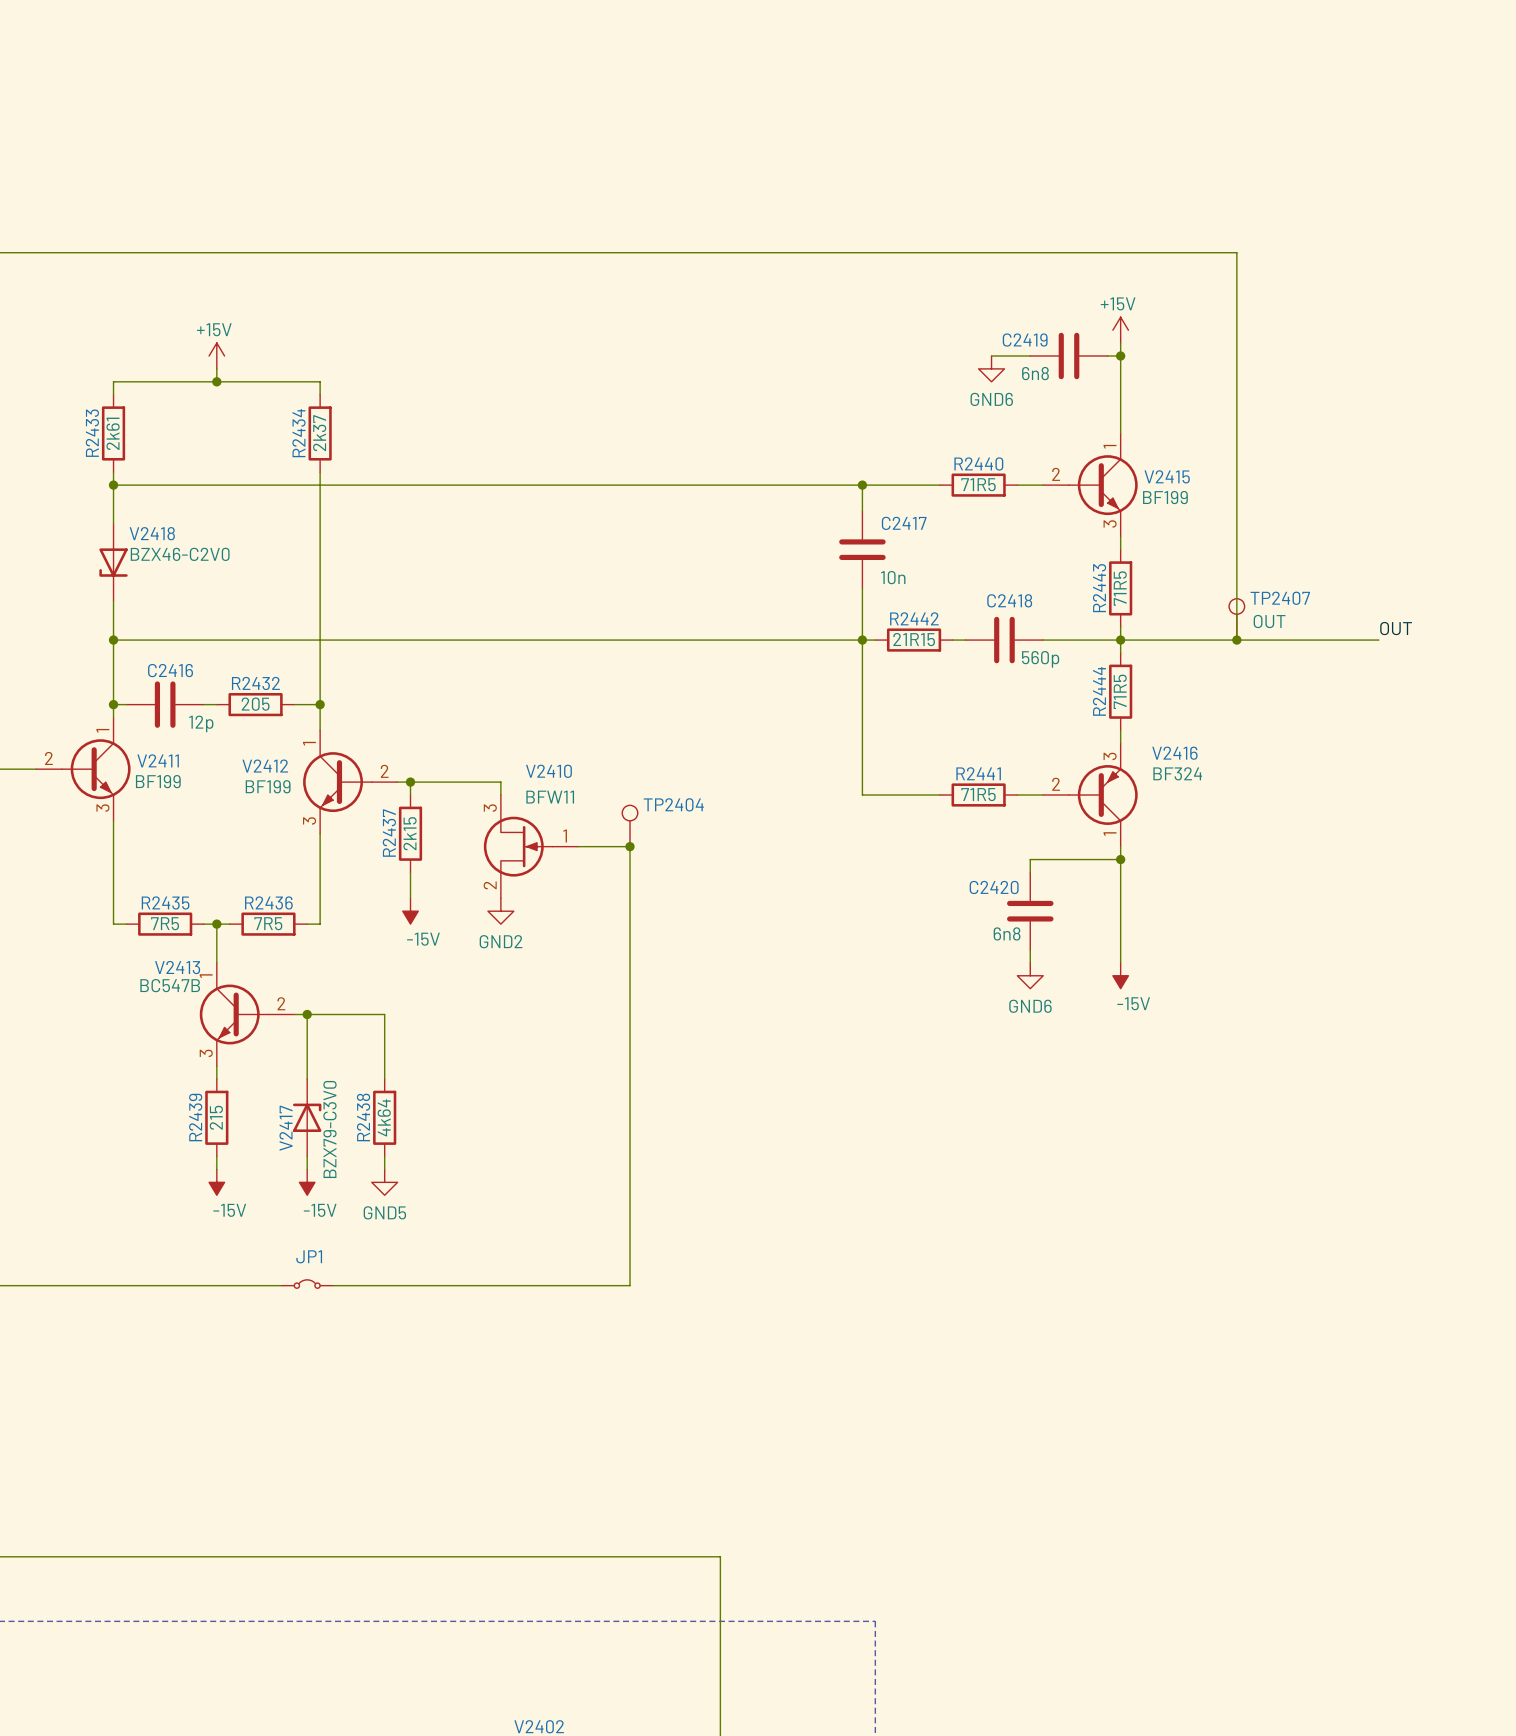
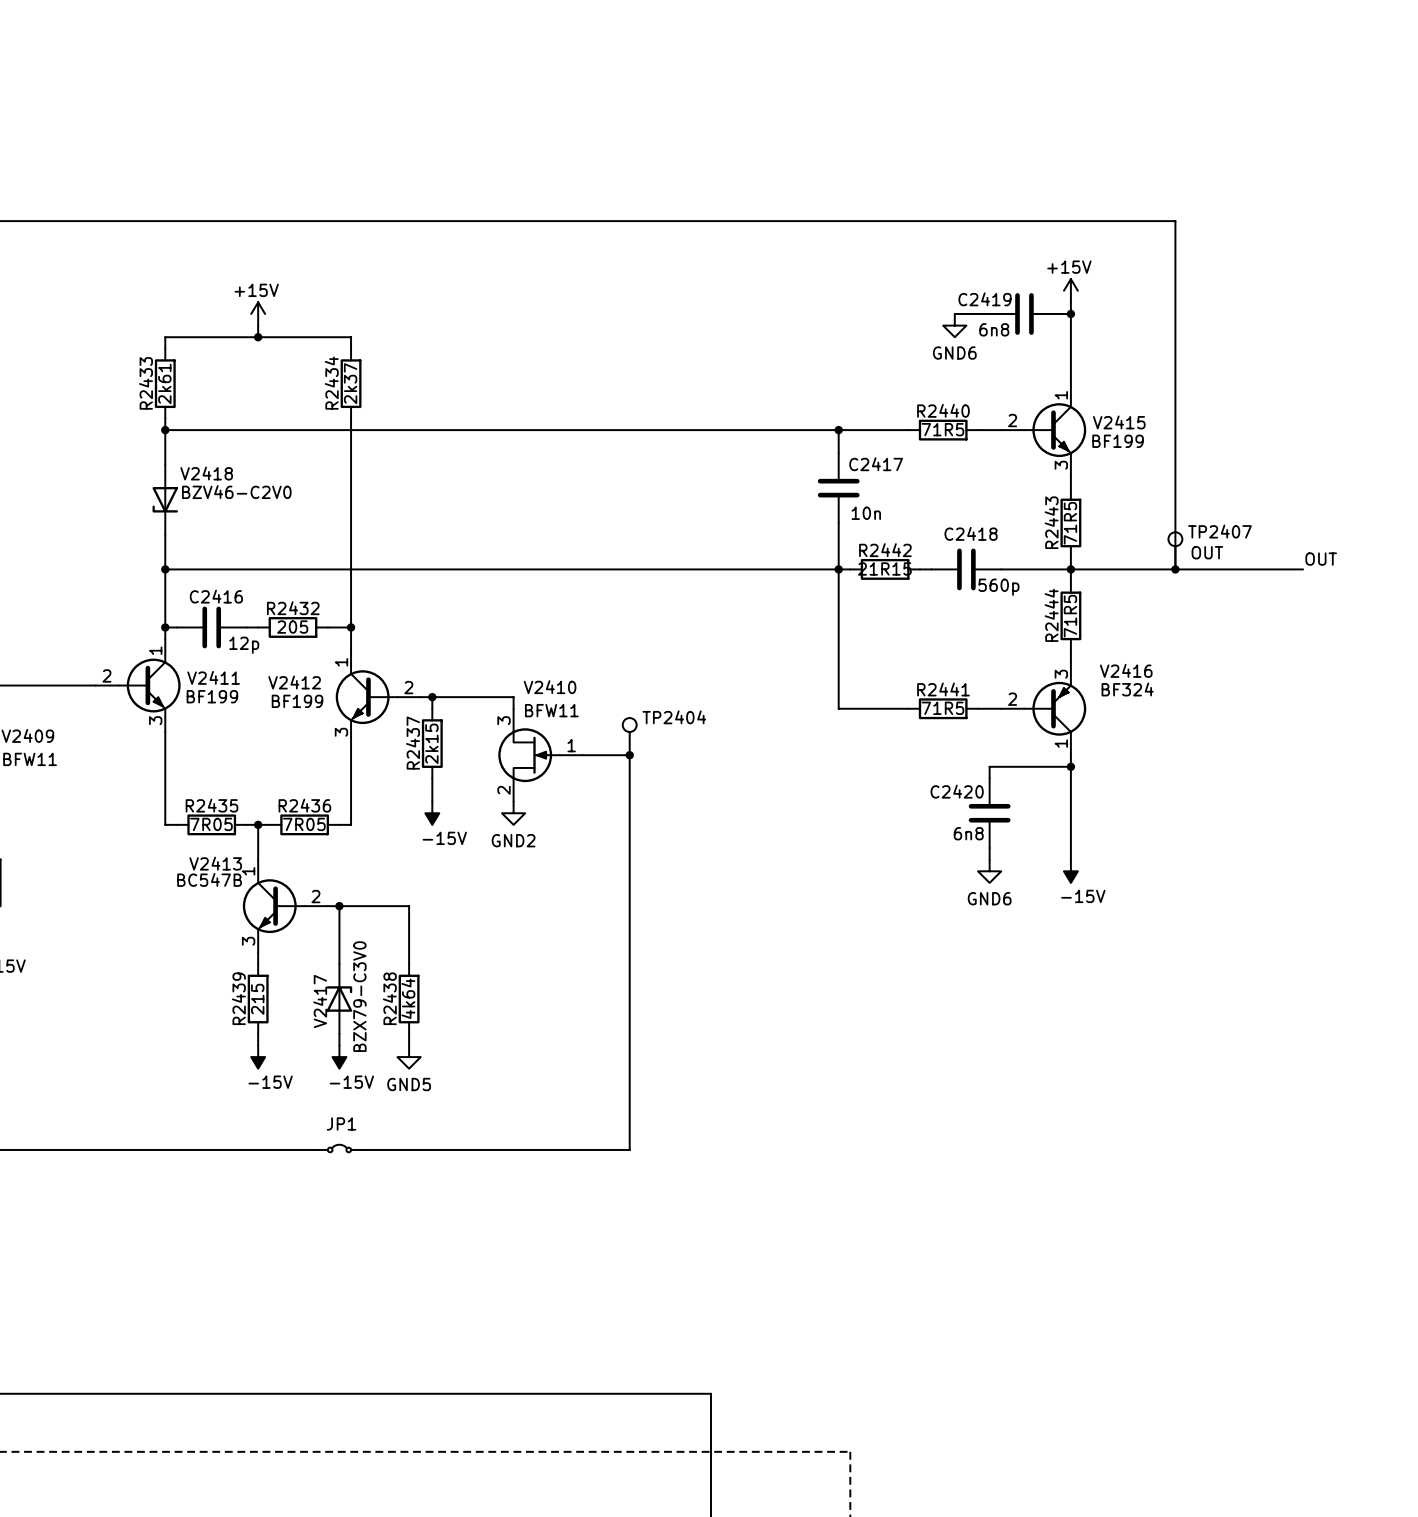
V2418 value: BZX46-C2V0 (180, 554) -> BZV46-C2V0 (236, 492)
R2435 value: 7R5 (165, 923) -> 7R05 (211, 824)
R2436 value: 7R5 (268, 923) -> 7R05 (304, 824)

